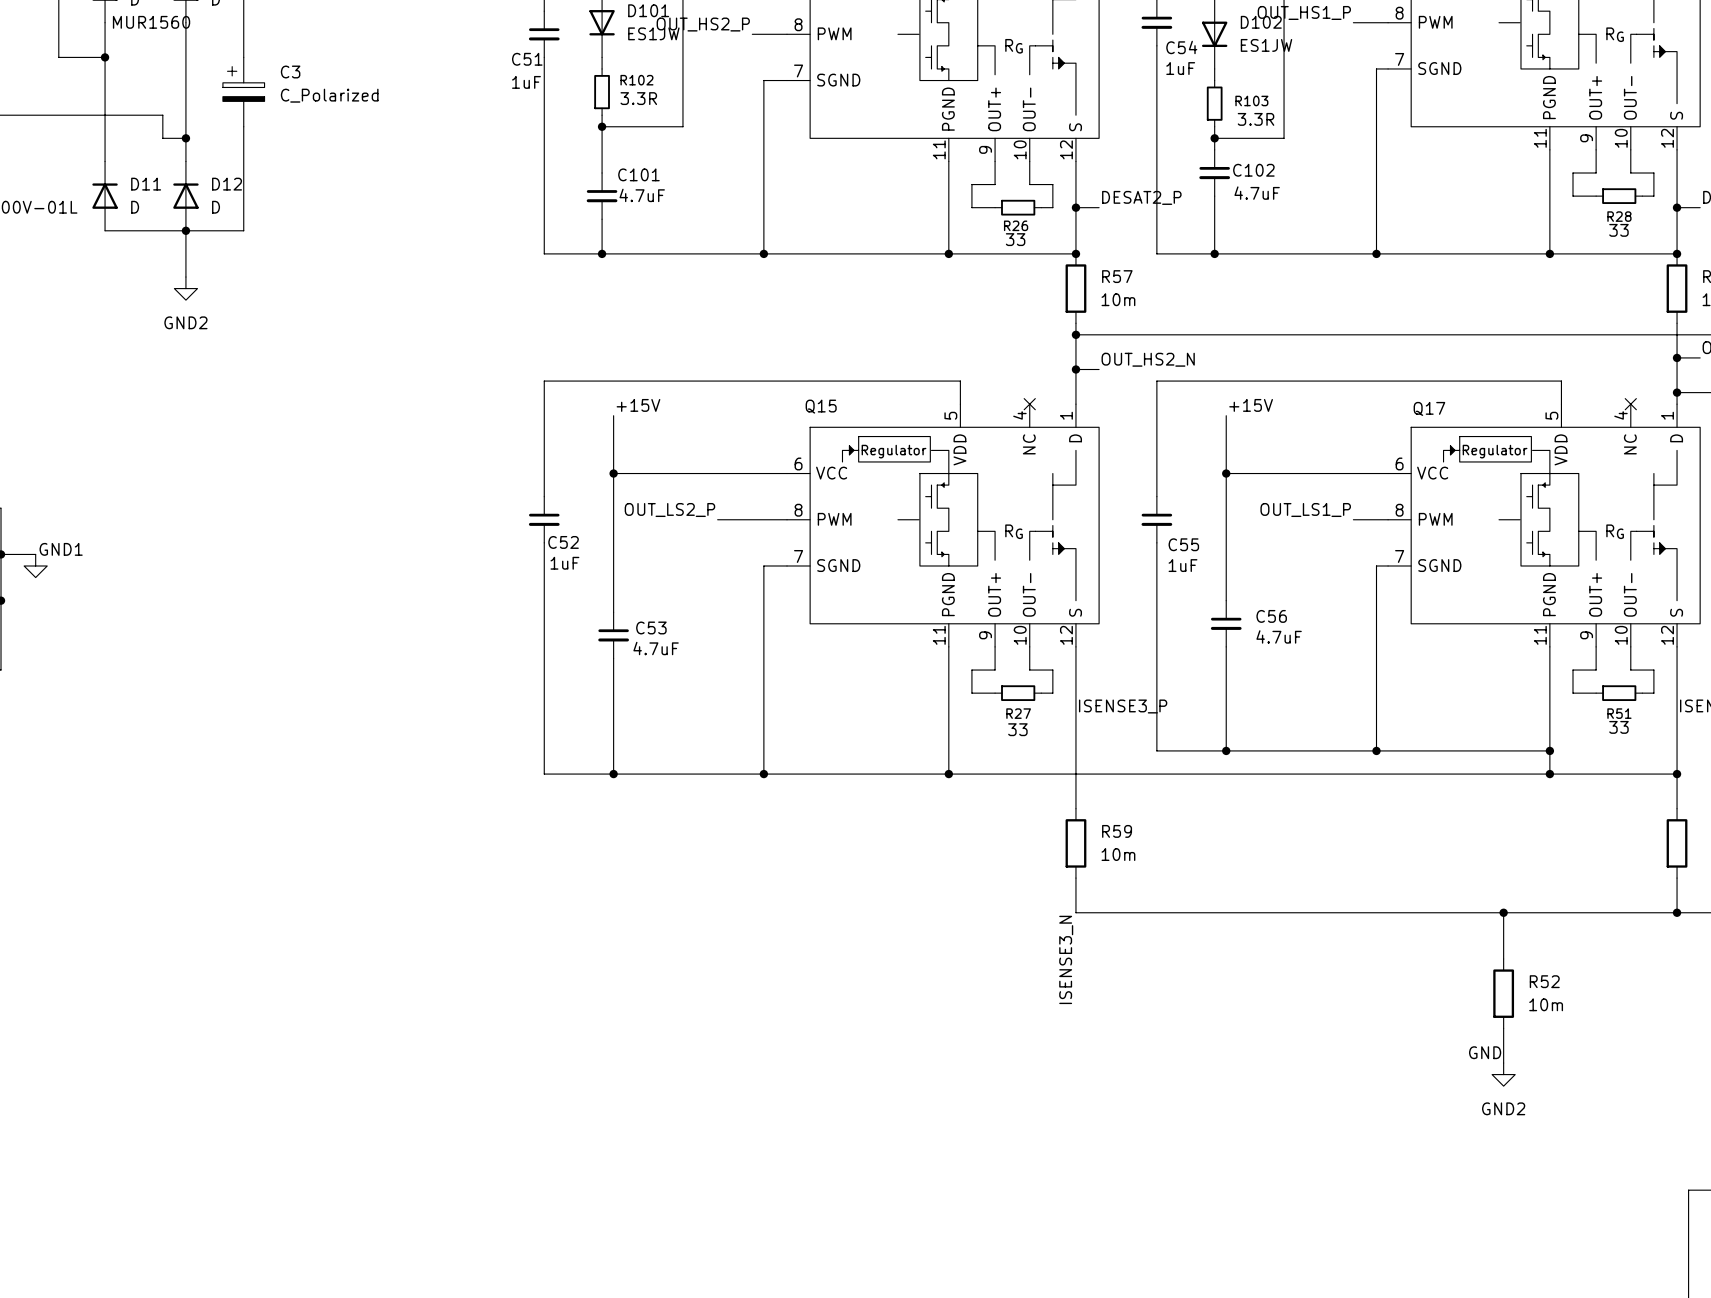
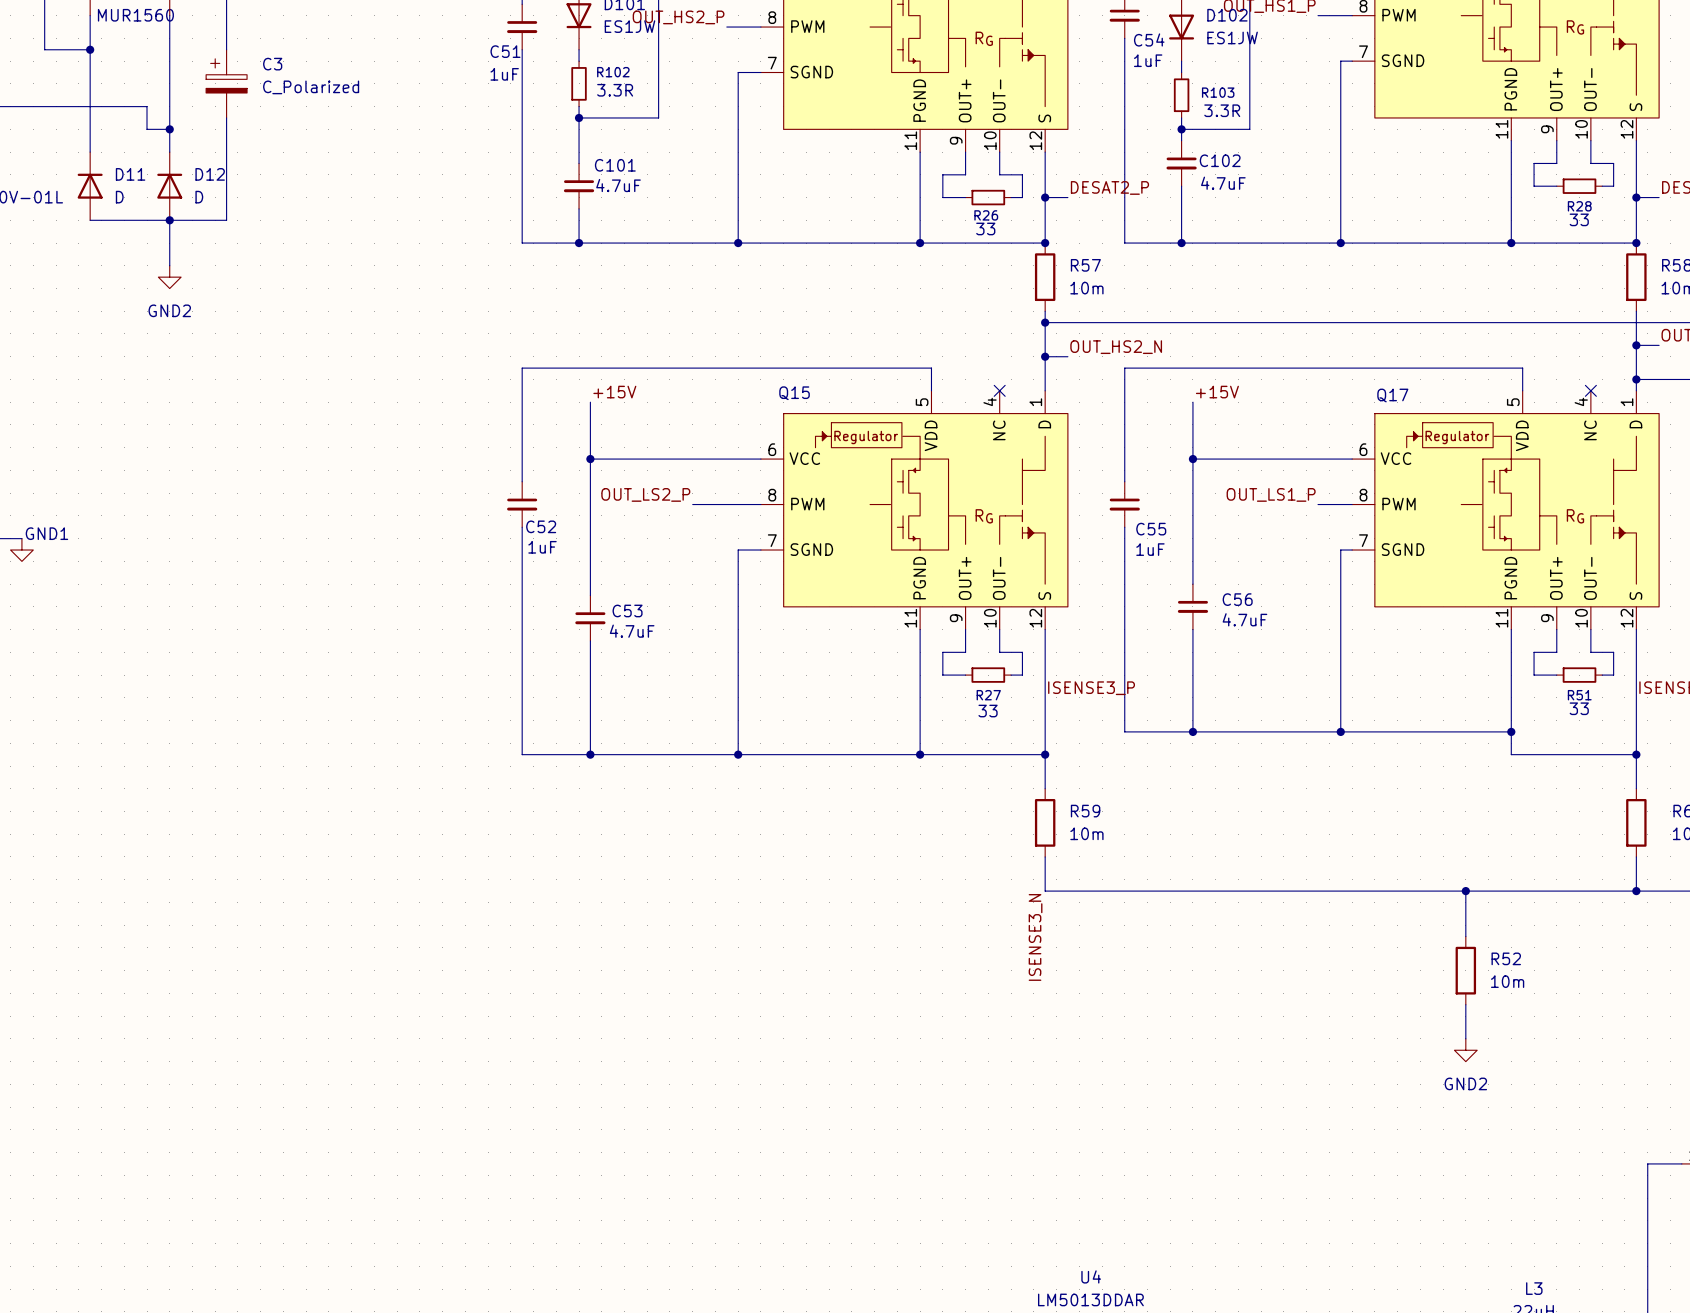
wire: (1075, 774) (1549, 774) -> none
junction: none -> (1045, 754)
junction: (1549, 774) -> none
label: GND (1485, 1052) -> none

